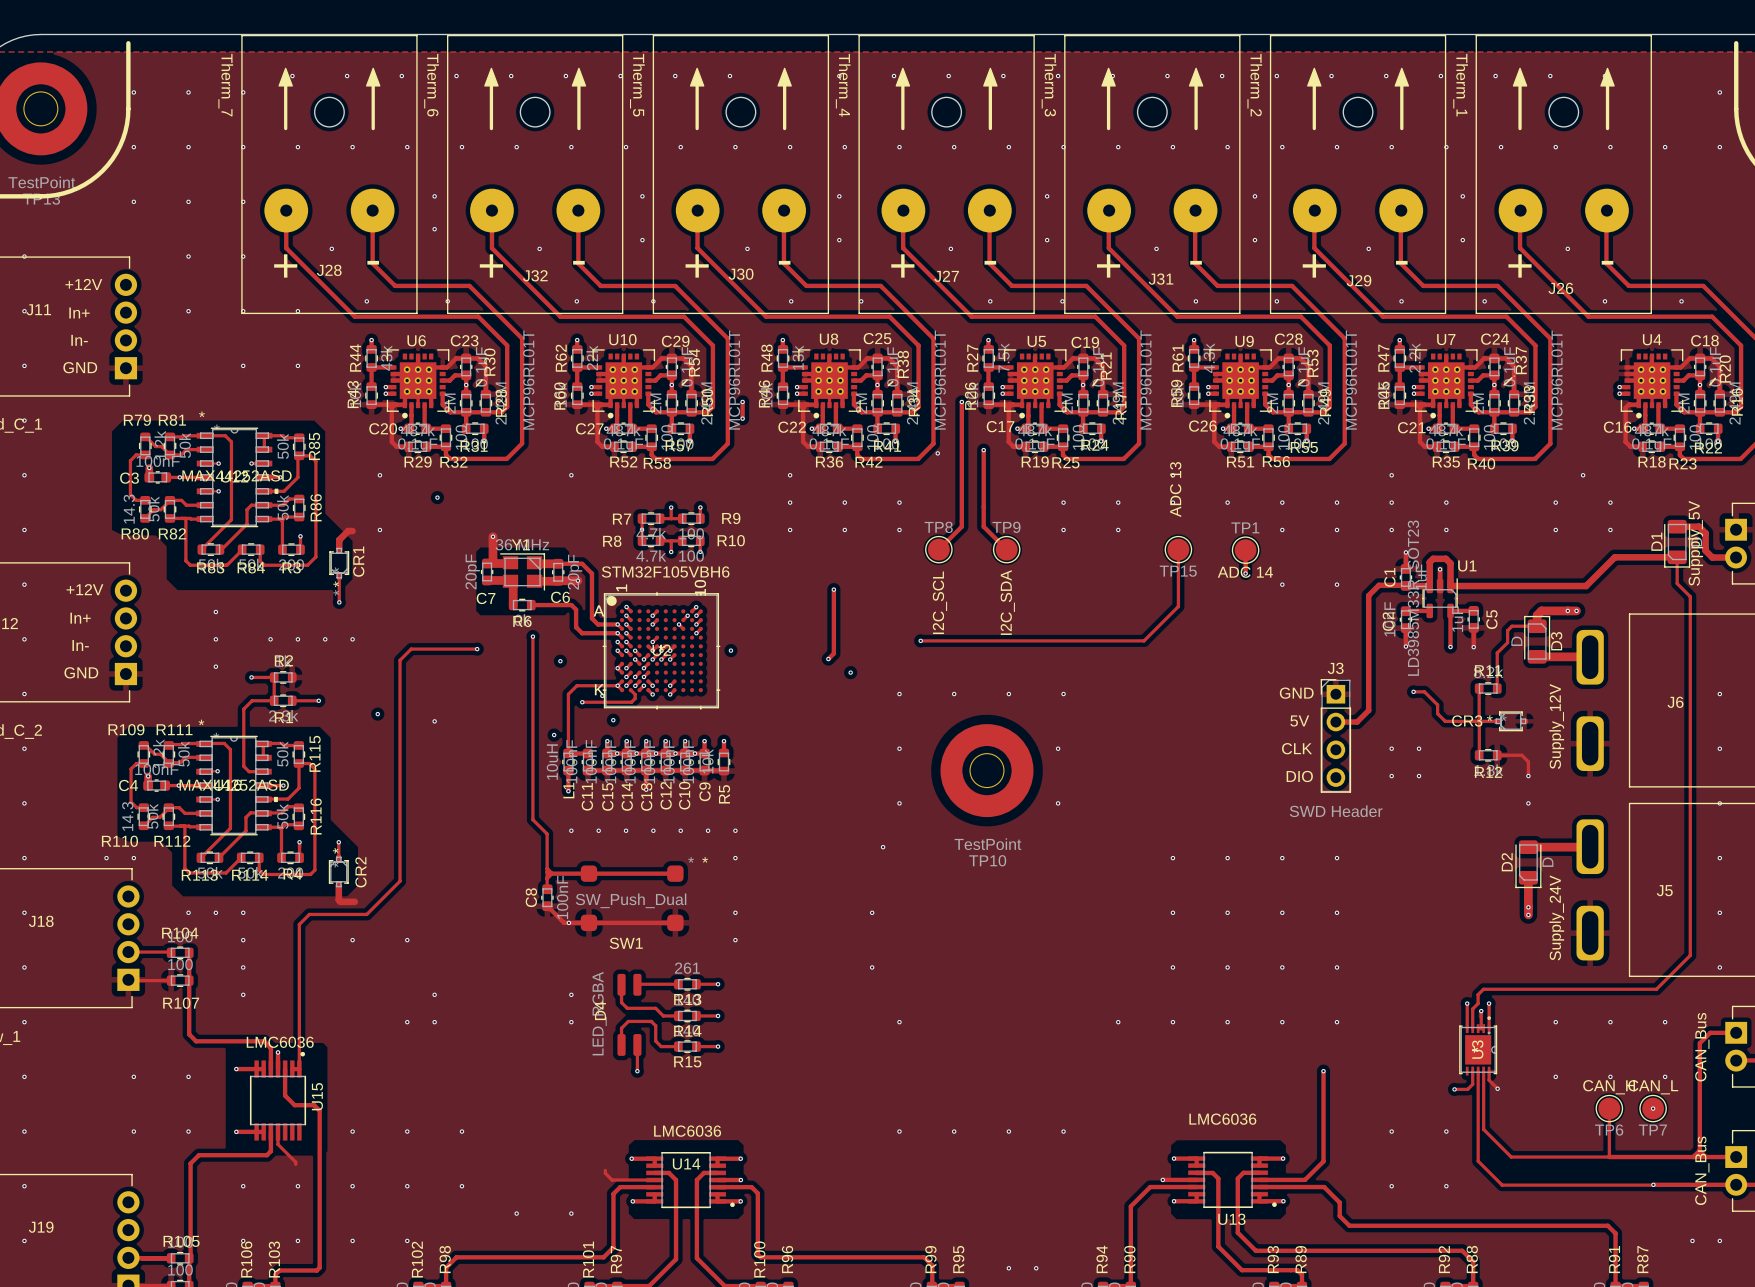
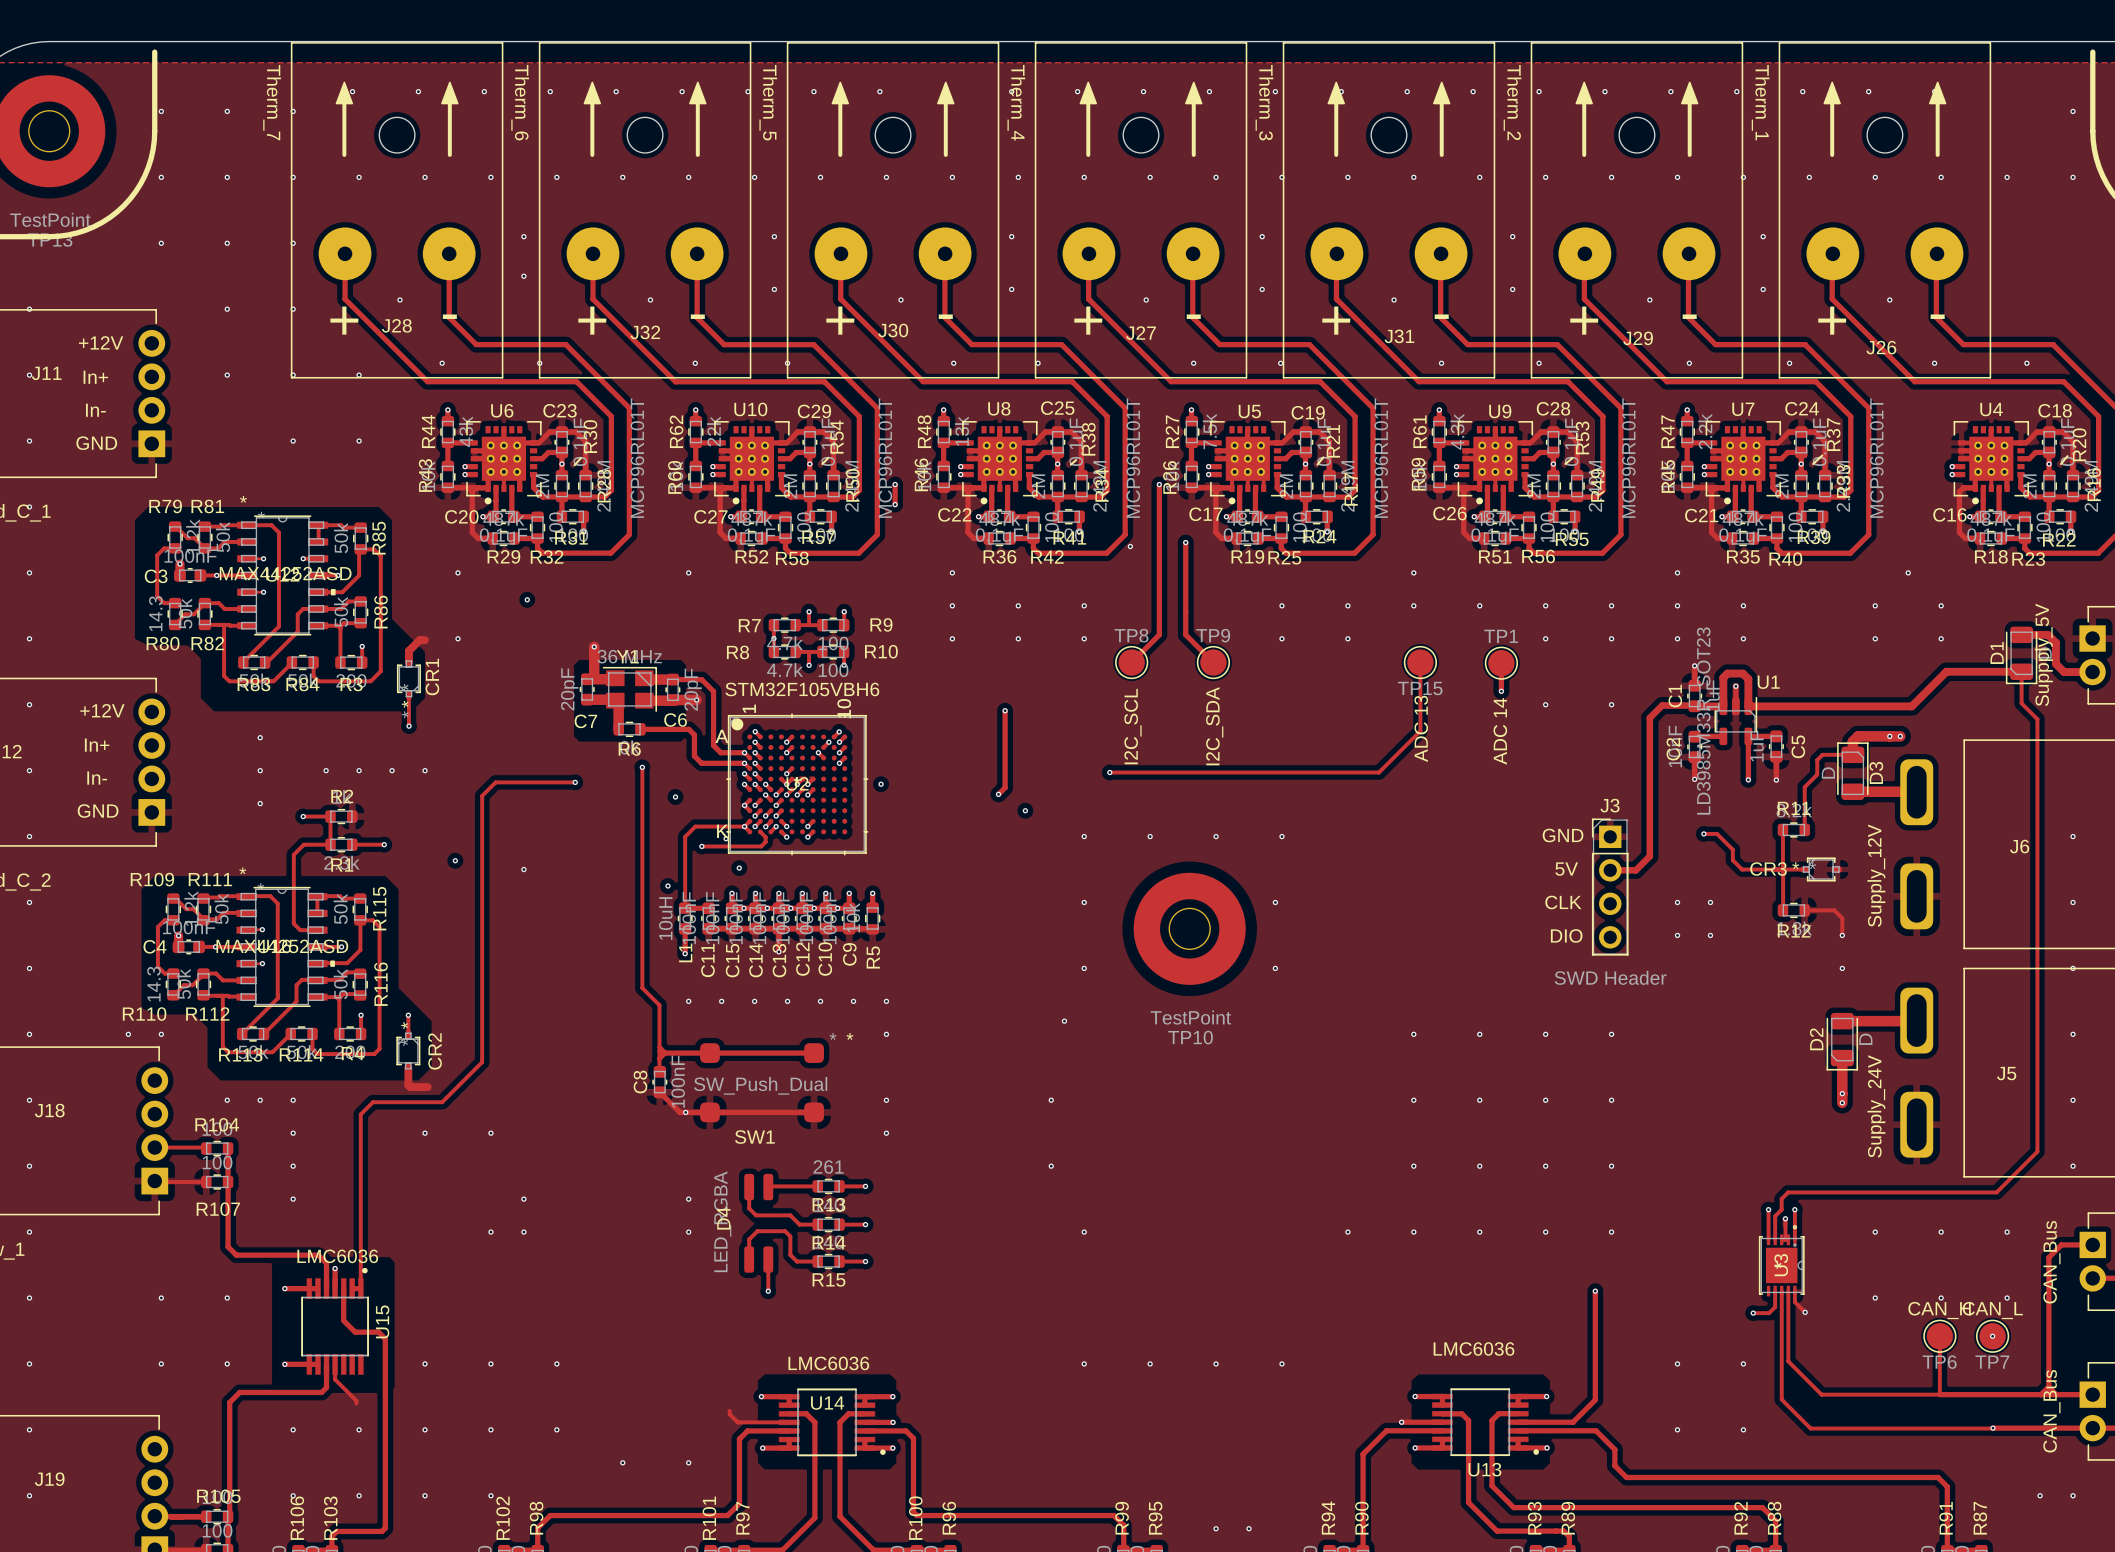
TP15 value position: ADC 13 (1175, 489) -> ADC 13 (1421, 728)
TP1 value rotation: 0° (1245, 572) -> 90° counterclockwise (1500, 731)

